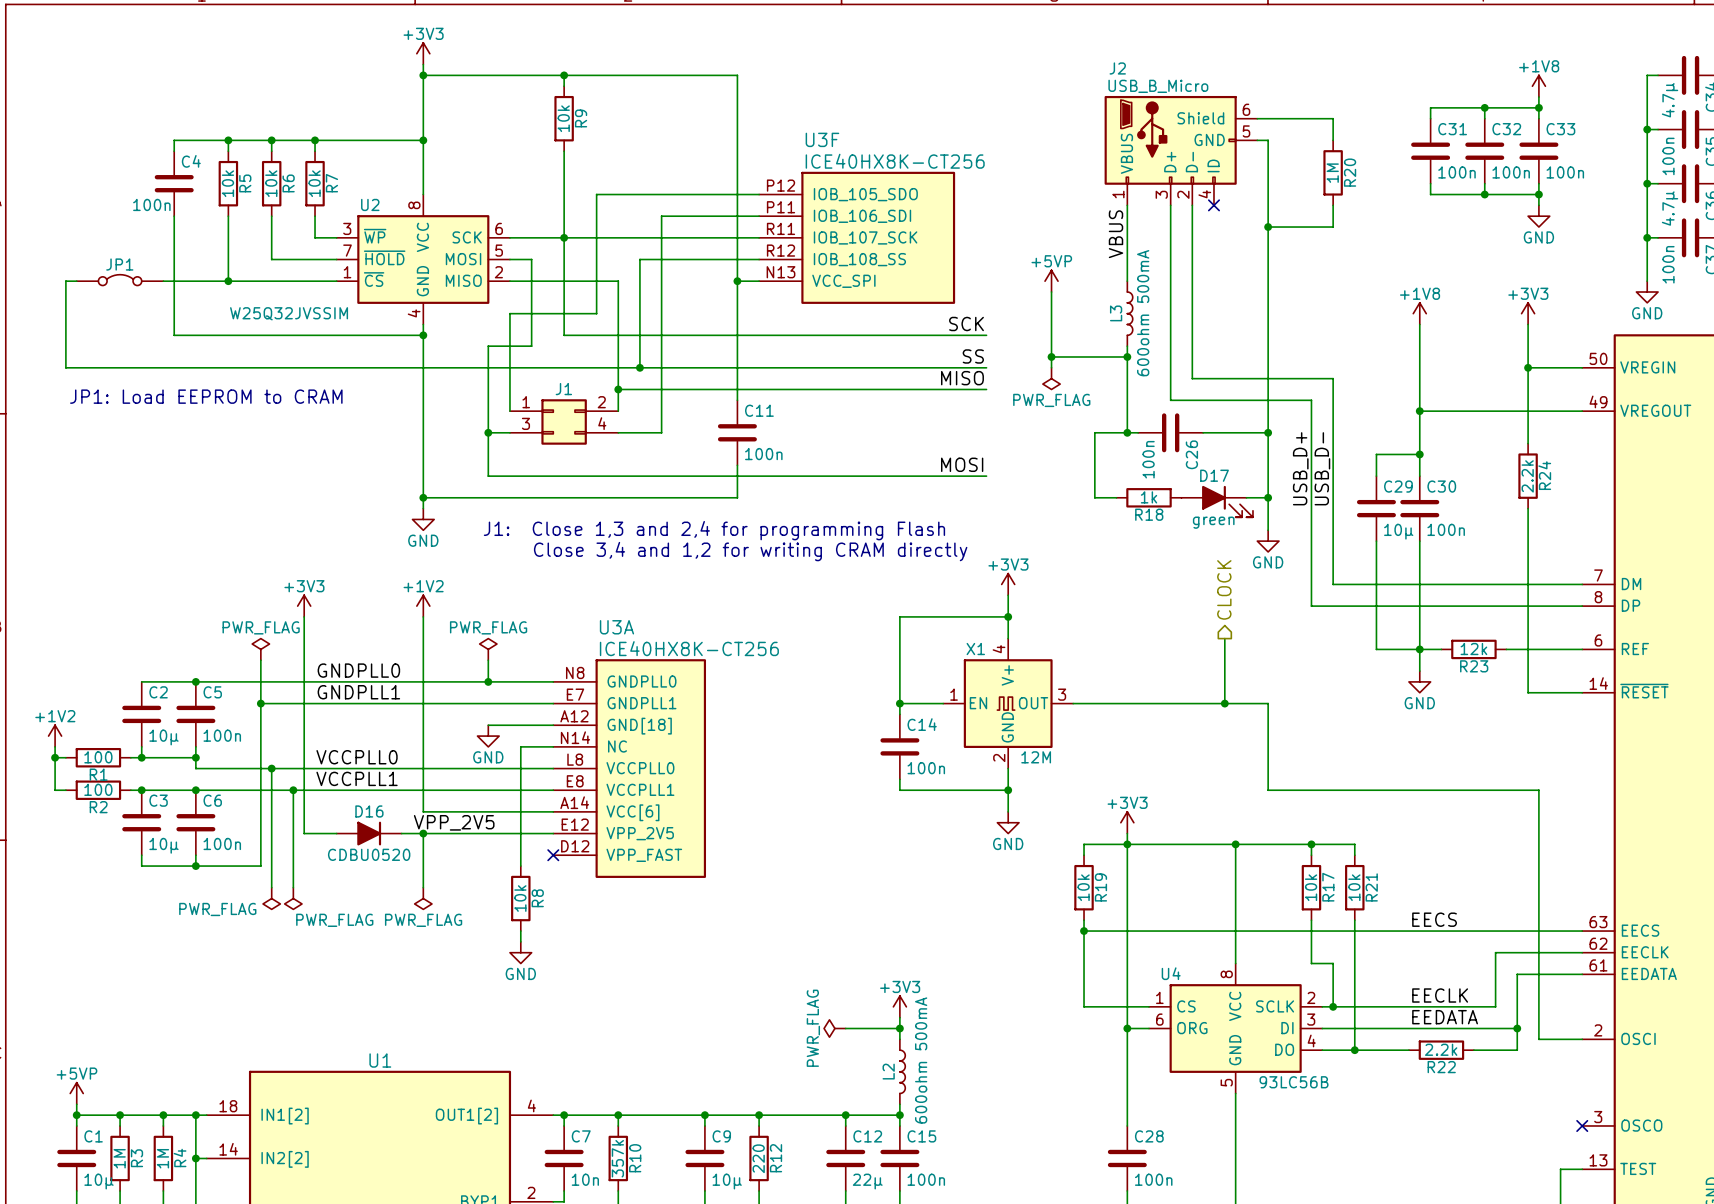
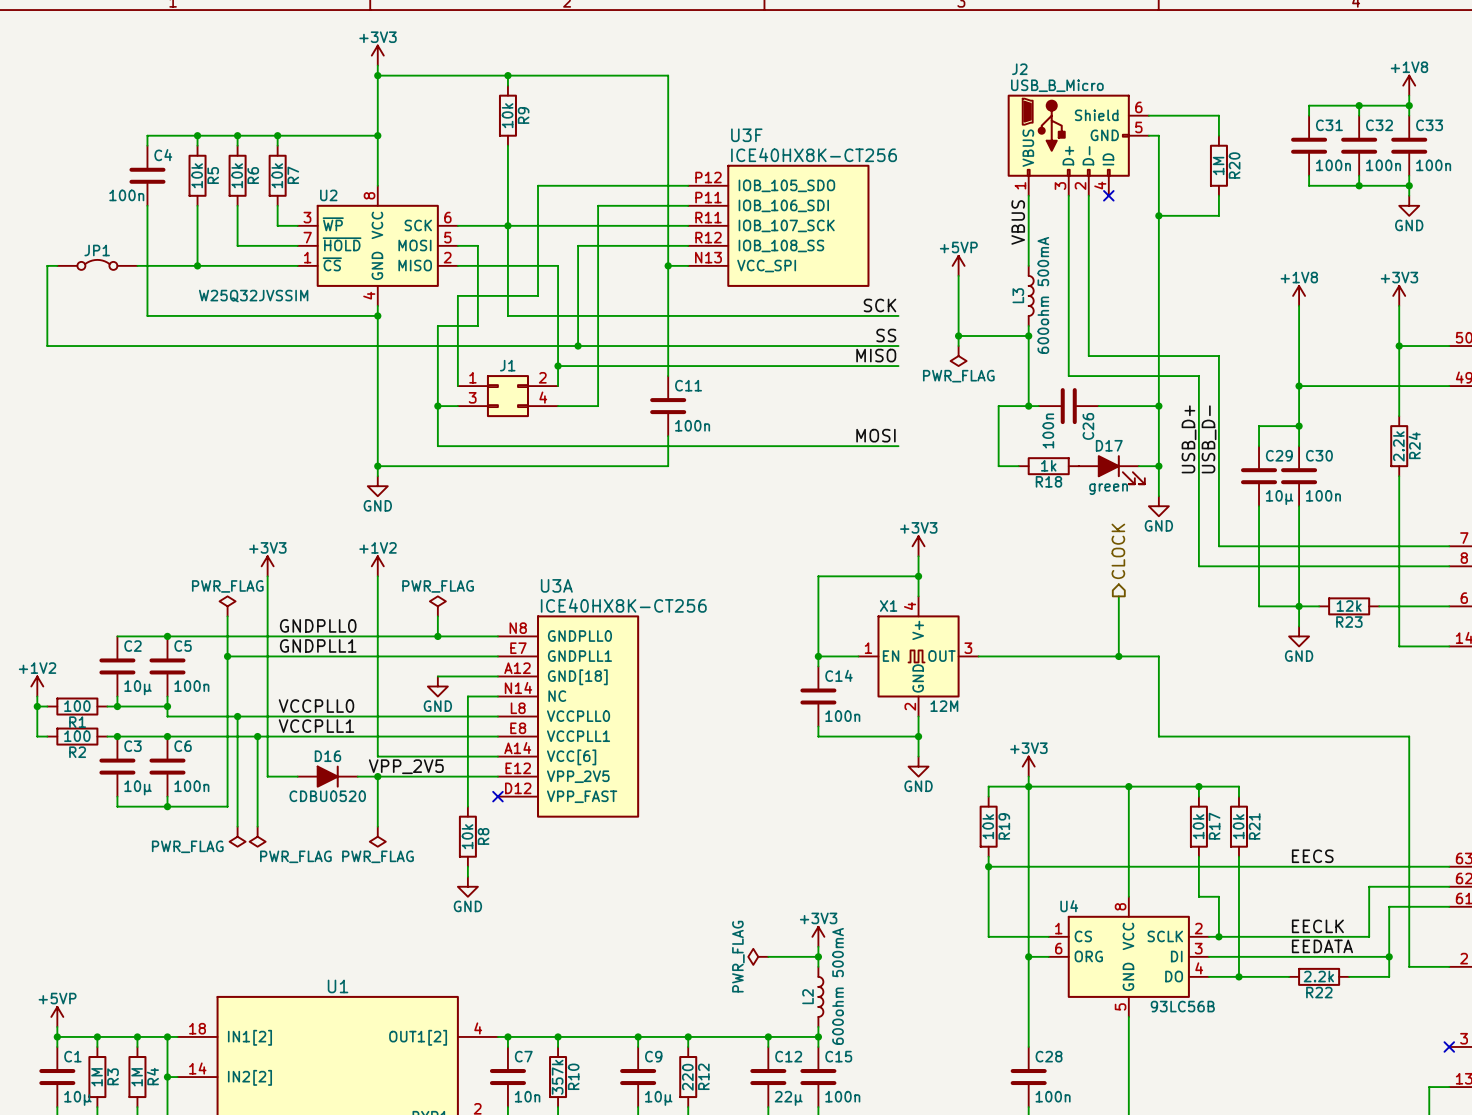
text: JP1: Load EEPROM to CRAM (206, 396) -> none
text: J1: Close 1,3 and 2,4 for programming Flash (714, 530) -> none
text: Close 3,4 and 1,2 for writing CRAM directly (750, 551) -> none

